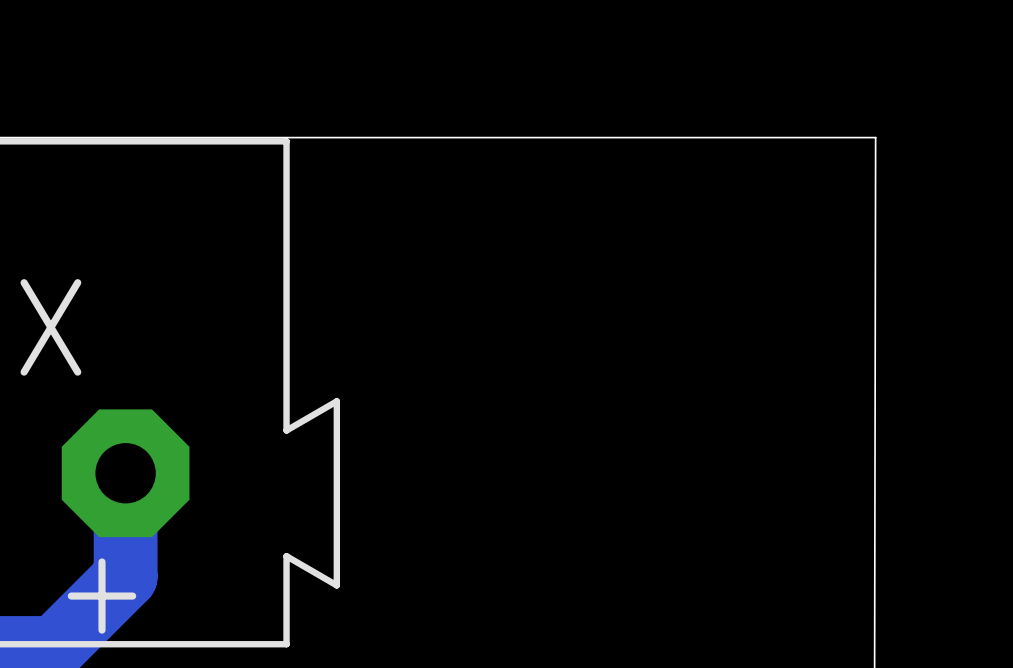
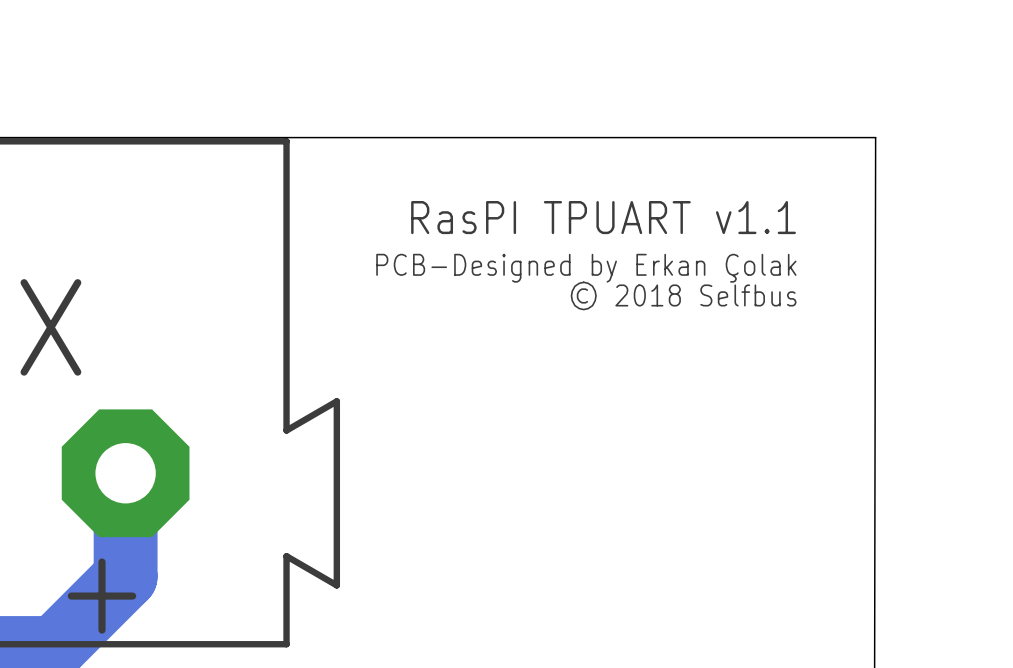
text: none -> RasPI TPUART v1.1 (603, 217)
text: none -> PCB-Designed by Erkan Çolak (586, 268)
text: none -> © 2018 Selfbus (683, 295)

